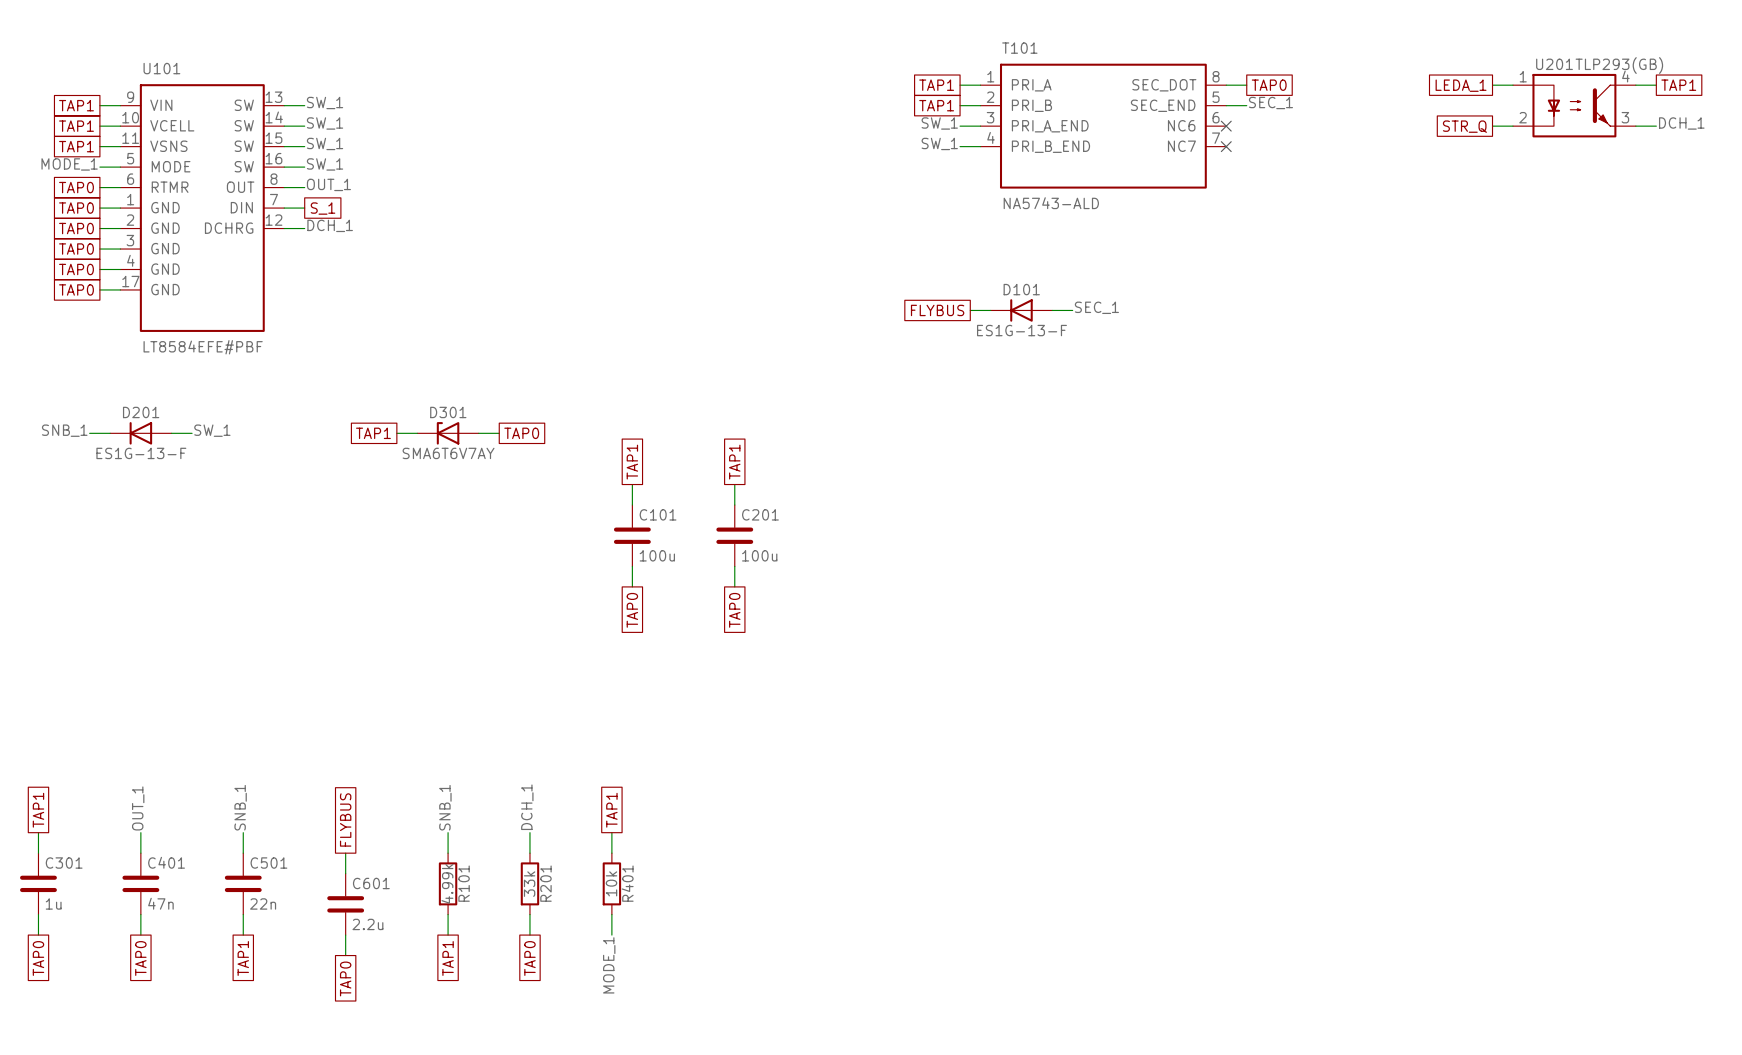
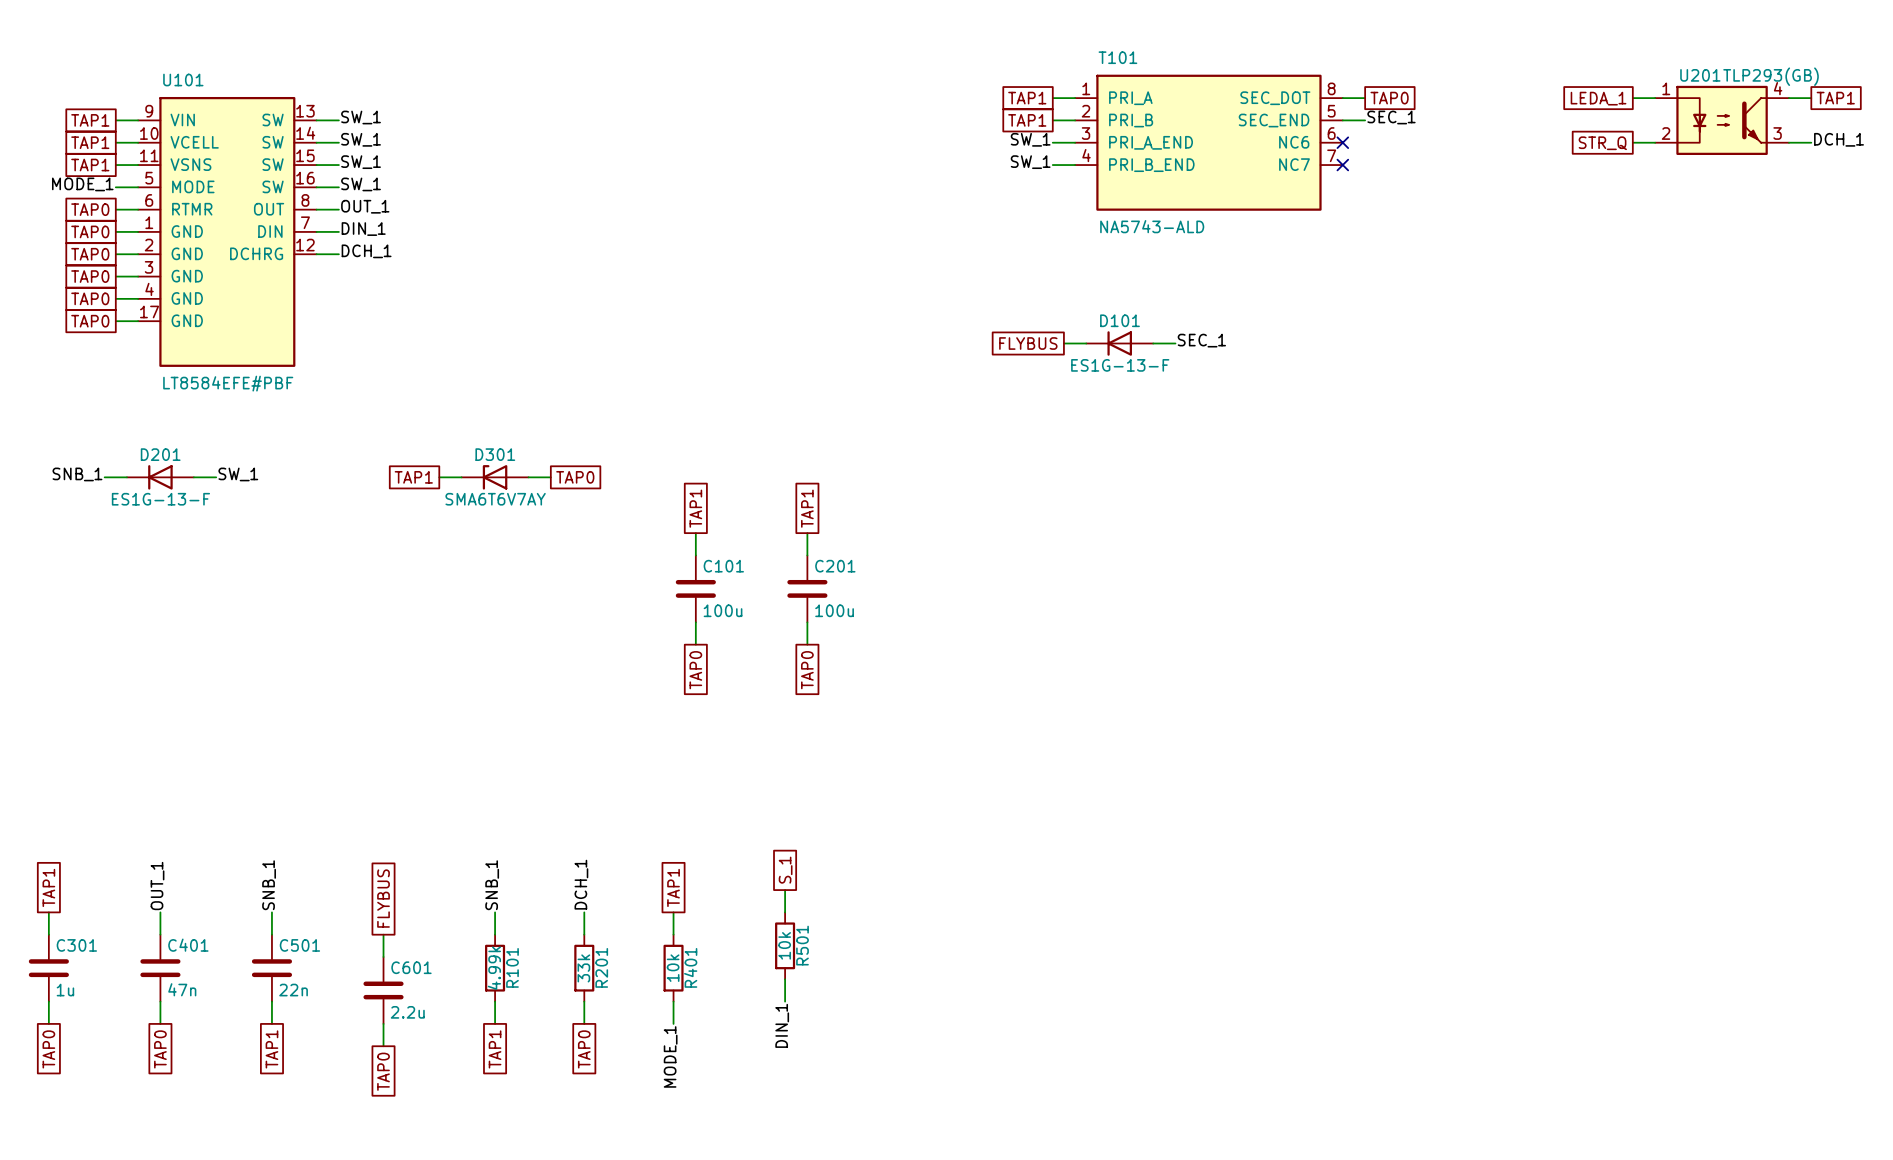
label: none -> DIN_1 (363, 229)
global label: S_1 (323, 208) -> none
global label: none -> S_1 (785, 870)
wire: none -> (785, 890) (785, 912)
R501: none -> 10k (785, 945)
wire: none -> (785, 979) (785, 1001)
label: none -> DIN_1 (782, 1025)

